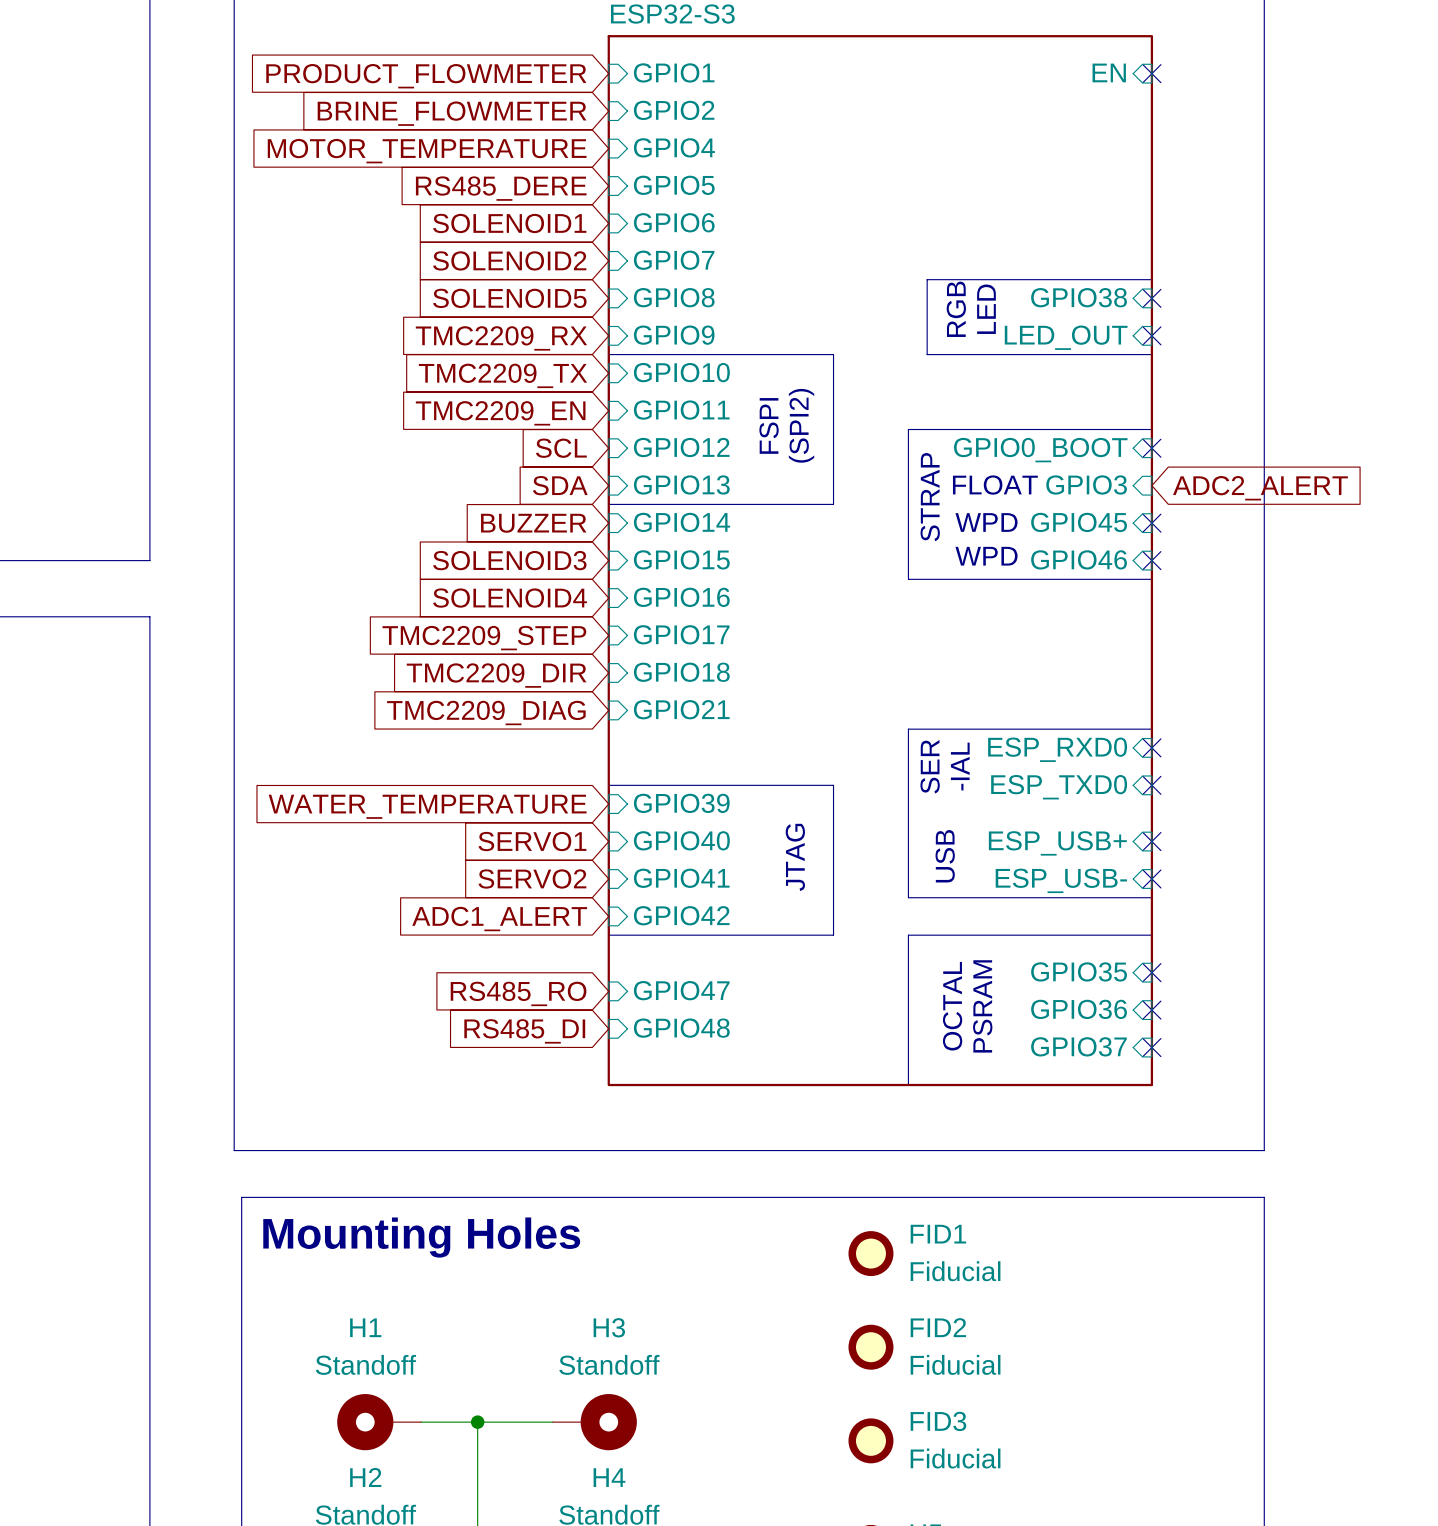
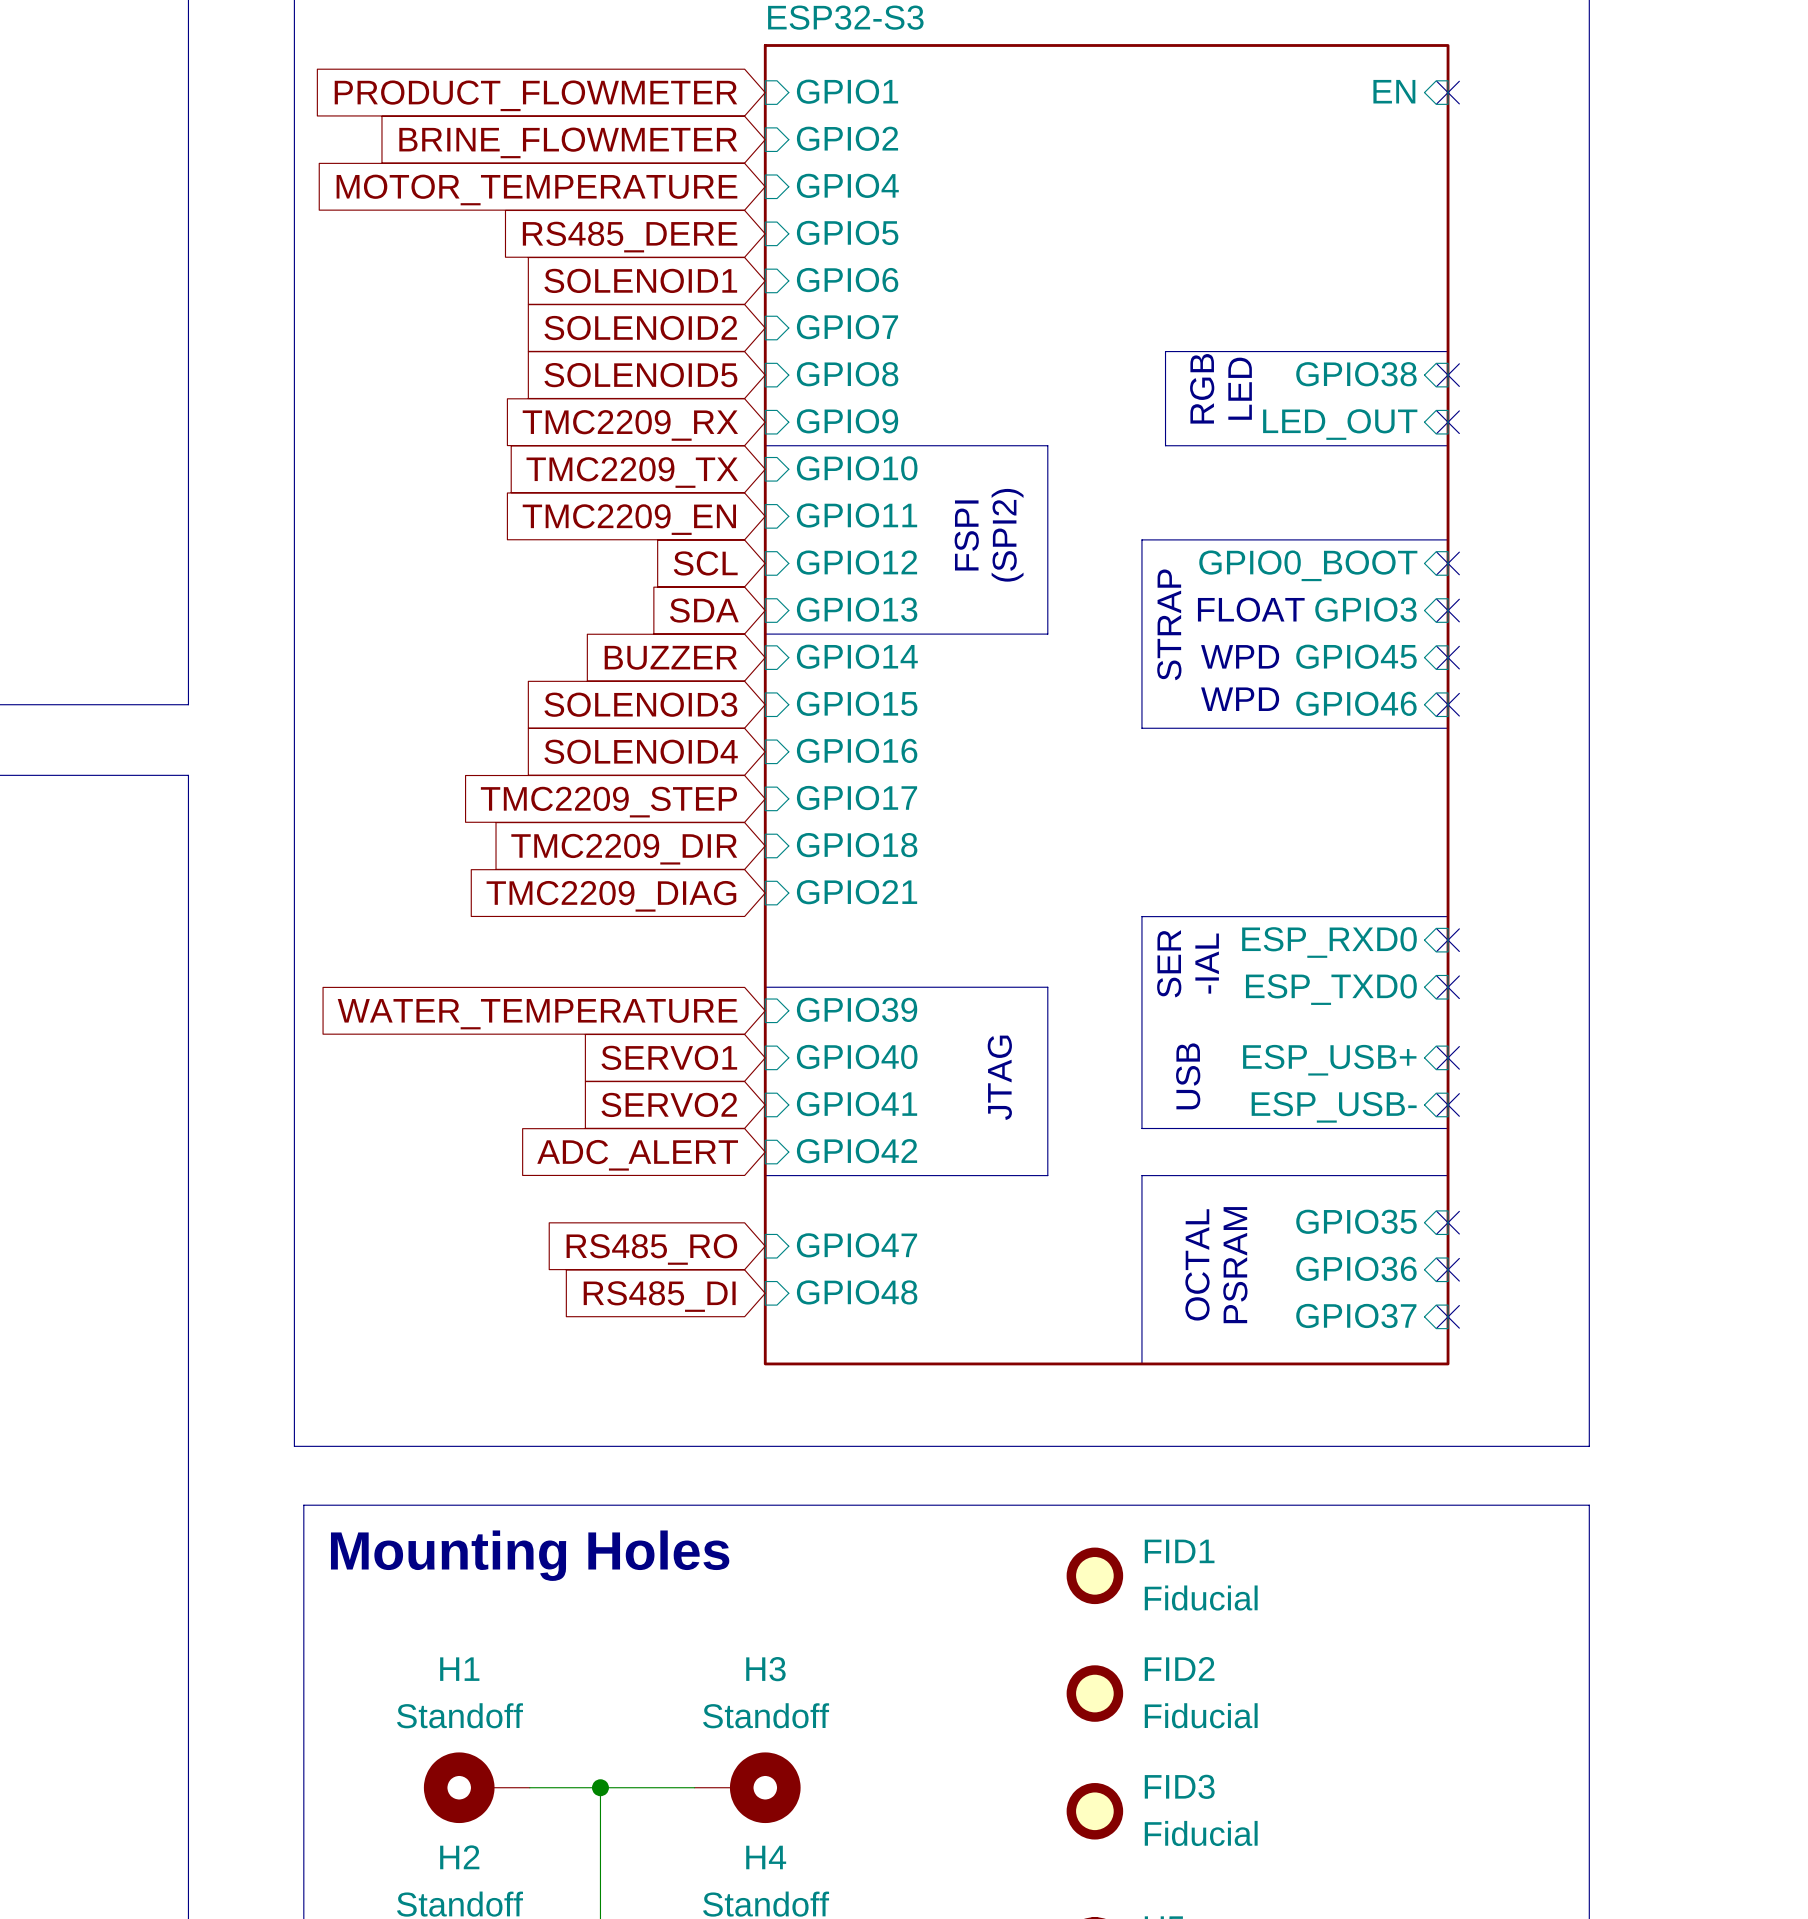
no-connect mark: none -> (1448, 610)
global label: ADC2_ALERT (1260, 488) -> none
global label: ADC1_ALERT (499, 919) -> ADC_ALERT (637, 1155)

